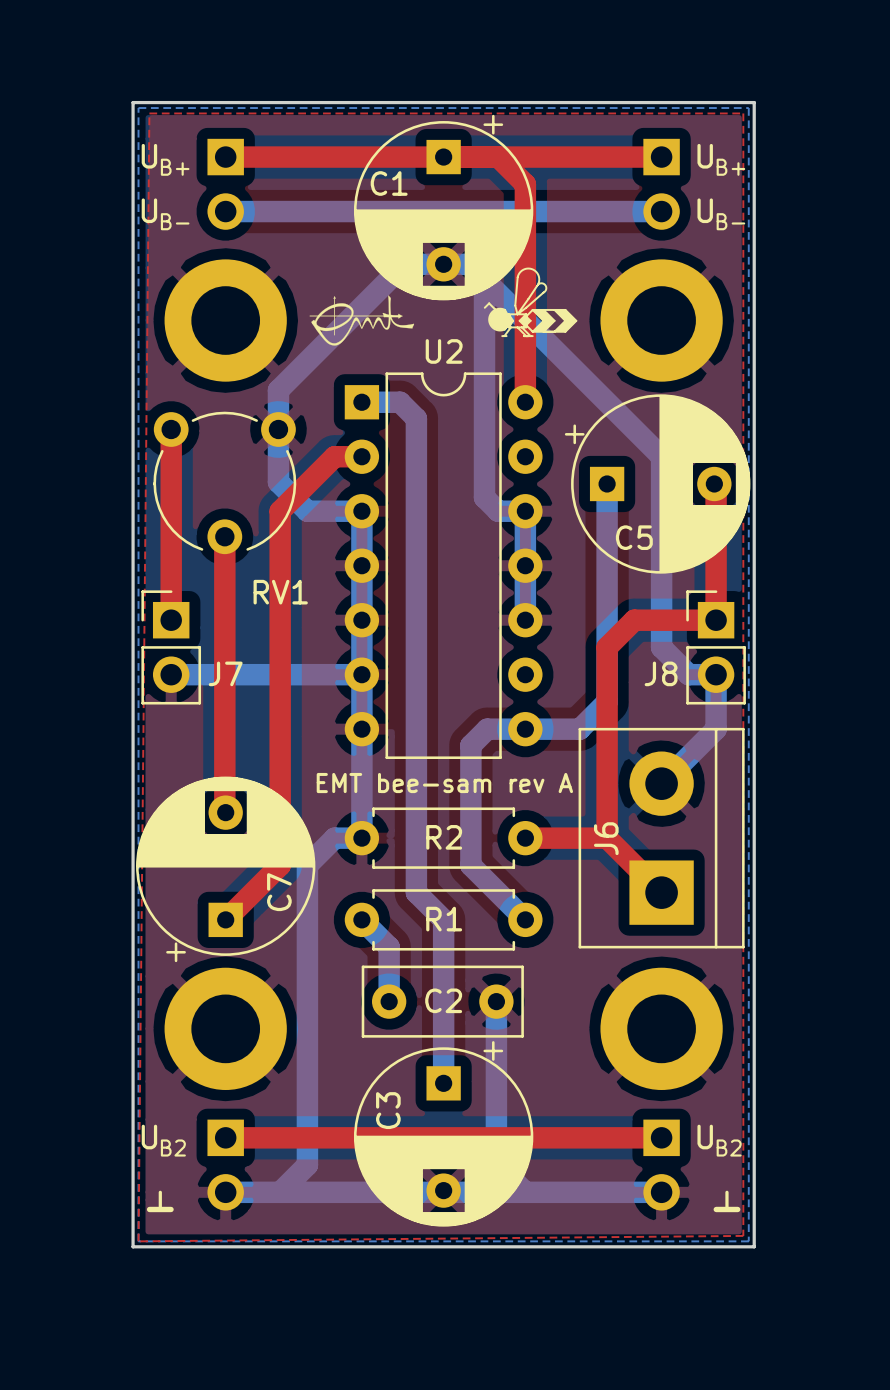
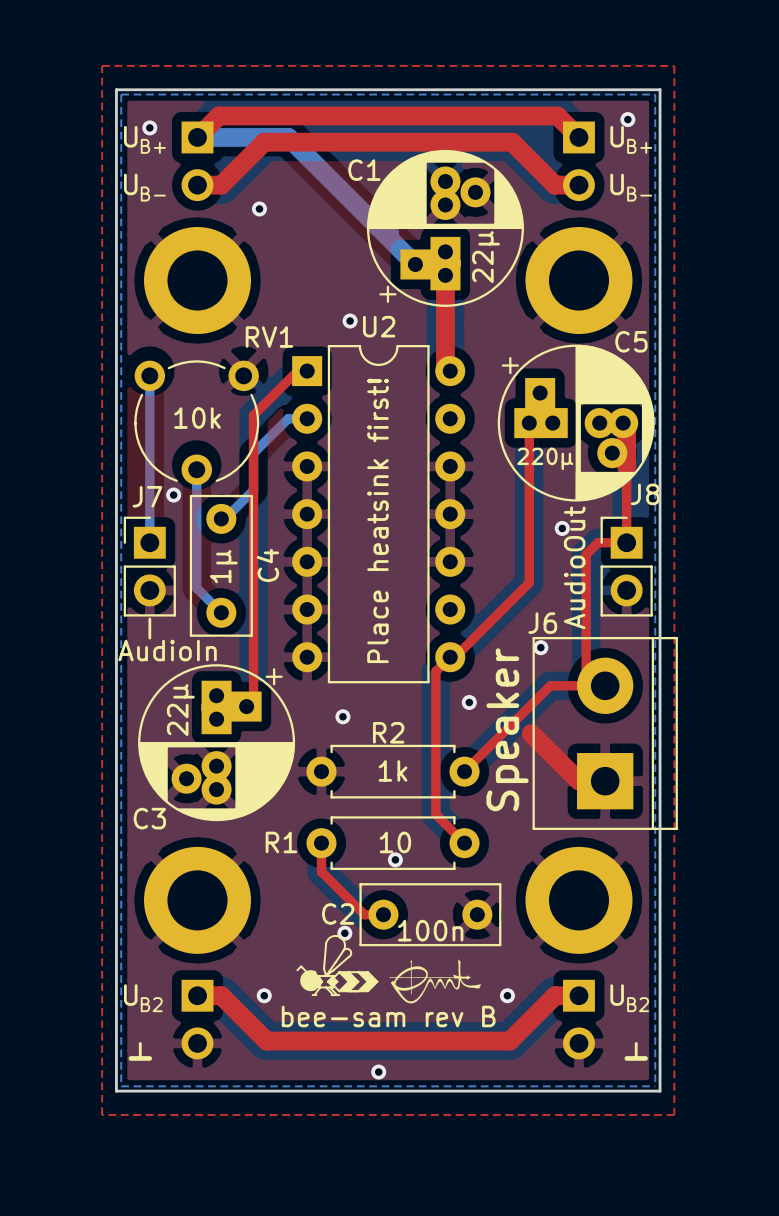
top zone outline: (149, 113) (138, 1241) (743, 1235) (743, 113) (149, 113) -> (102, 65) (102, 1114) (674, 1114) (674, 65) (102, 65)
C1 footprint: [353, 114, 534, 301] -> [366, 149, 524, 307]
via: none -> (627, 119)
via: none -> (149, 127)
bottom track: none -> (197, 137) (288, 137) (415, 264)
top track: (225, 157) (661, 157) -> (197, 137) (218, 115) (557, 115) (578, 137)
top track: (498, 157) (525, 184) (525, 402) -> none
C1 name position: C1 (389, 183) -> C1 (364, 170)
bottom track: (225, 211) (661, 211) -> none
top track: none -> (197, 185) (221, 185) (264, 142) (512, 142) (555, 185) (578, 185)
via: none -> (259, 208)
drawing: [484, 268, 577, 337] -> none
bottom track: (484, 279) (484, 497) (498, 511) (525, 511) (525, 620) -> none
top track: none -> (445, 251) (445, 366) (450, 371)
C1 value: none -> 22µ (486, 257)
drawing: [309, 295, 415, 346] -> none
via: none -> (350, 321)
C5 footprint: [564, 394, 751, 574] -> [497, 344, 655, 502]
bottom track: (361, 402) (400, 402) (416, 418) (416, 892) (443, 919) (443, 1083) -> none
bottom track: none -> (149, 371) (149, 542)
top track: none -> (307, 371) (297, 371) (253, 415) (253, 698) (246, 706) (227, 706) (216, 695) (216, 719) (229, 706)
top track: (171, 429) (171, 620) -> none
top track: (361, 456) (334, 456) (280, 511) (280, 865) (225, 919) -> none
RV1 value: none -> 10k (197, 418)
bottom track: none -> (307, 418) (288, 418) (253, 453) (253, 490) (224, 518) (221, 518)
top track: none -> (529, 423) (529, 582) (455, 657)
bottom track: (607, 483) (607, 701) (579, 729) (487, 729) (470, 745) (470, 865) (525, 919) -> none
C5 value: none -> 220µ (545, 458)
bottom track: none -> (196, 464) (196, 588) (221, 612)
top track width: thick (716, 534) (716, 620) (683, 620) -> thin (626, 467) (626, 542) (598, 542)
top track: (224, 536) (225, 812) -> none
C5 name position: C5 (634, 537) -> C5 (631, 341)
via: none -> (173, 495)
U2 position: (443, 565) -> (378, 514)
RV1 name position: RV1 (280, 592) -> RV1 (269, 337)
text: none -> Place heatsink first! (378, 520)
via: none -> (562, 528)
top track: (683, 620) (634, 620) (607, 647) (607, 838) (525, 838) -> (598, 542) (586, 554) (586, 676) (595, 685)
C4: none -> 1µ (221, 565)
J8 value: none -> AudioOut (574, 567)
J7 name position: J7 (225, 673) -> J7 (147, 496)
J8 name position: J8 (661, 673) -> J8 (645, 494)
bottom track: (171, 674) (361, 674) -> none
line: none -> (149, 619) (149, 638)
via: none -> (540, 647)
J7 value: none -> AudioIn (167, 650)
top track: none -> (450, 657) (435, 671) (435, 814) (464, 843)
text: EMT bee-sam rev A (444, 783) -> none
bottom track: (661, 783) (716, 729) (716, 674) (688, 674) (661, 647) (661, 456) (469, 264) (404, 264) (278, 390) (278, 482) (307, 511) (361, 511) (361, 838) (334, 838) (307, 865) (307, 1165) (280, 1192) (225, 1192) (661, 1192) -> none
top track: none -> (607, 685) (550, 685) (464, 771)
via: none -> (469, 702)
C3 value: none -> 22µ (180, 710)
via: none -> (342, 716)
text: none -> Speaker (507, 729)
R2 position: (443, 838) -> (393, 771)
J6 name rotation: 0° (606, 838) -> 90° clockwise (542, 623)
J6 name position: J6 (606, 838) -> J6 (542, 623)
J6 position: (661, 838) -> (605, 733)
C7: (225, 869) -> none
R2 value: none -> 1k (393, 770)
bottom track: (361, 919) (389, 947) (389, 1001) -> none
R1 position: (443, 919) -> (393, 843)
R1 name position: R1 (444, 919) -> R1 (281, 842)
R1 value: none -> 10 (395, 842)
top track: none -> (321, 843) (321, 871) (364, 914) (383, 914)
via: none -> (395, 859)
C2 name position: C2 (443, 1000) -> C2 (338, 913)
C2 position: (442, 1001) -> (430, 914)
bottom track: (496, 1001) (496, 1163) (525, 1192) -> none
C3 footprint: [353, 1041, 534, 1227] -> [138, 664, 296, 822]
C2 value: none -> 100n (430, 930)
via: none -> (344, 933)
drawing: none -> [296, 935, 481, 1004]
C3 name position: C3 (388, 1110) -> C3 (149, 818)
top track: (252, 1137) (634, 1137) -> (221, 995) (266, 1041) (509, 1041) (555, 995)
via: none -> (264, 995)
via: none -> (507, 995)
text: none -> bee-sam rev B (388, 1016)
via: none -> (378, 1072)

